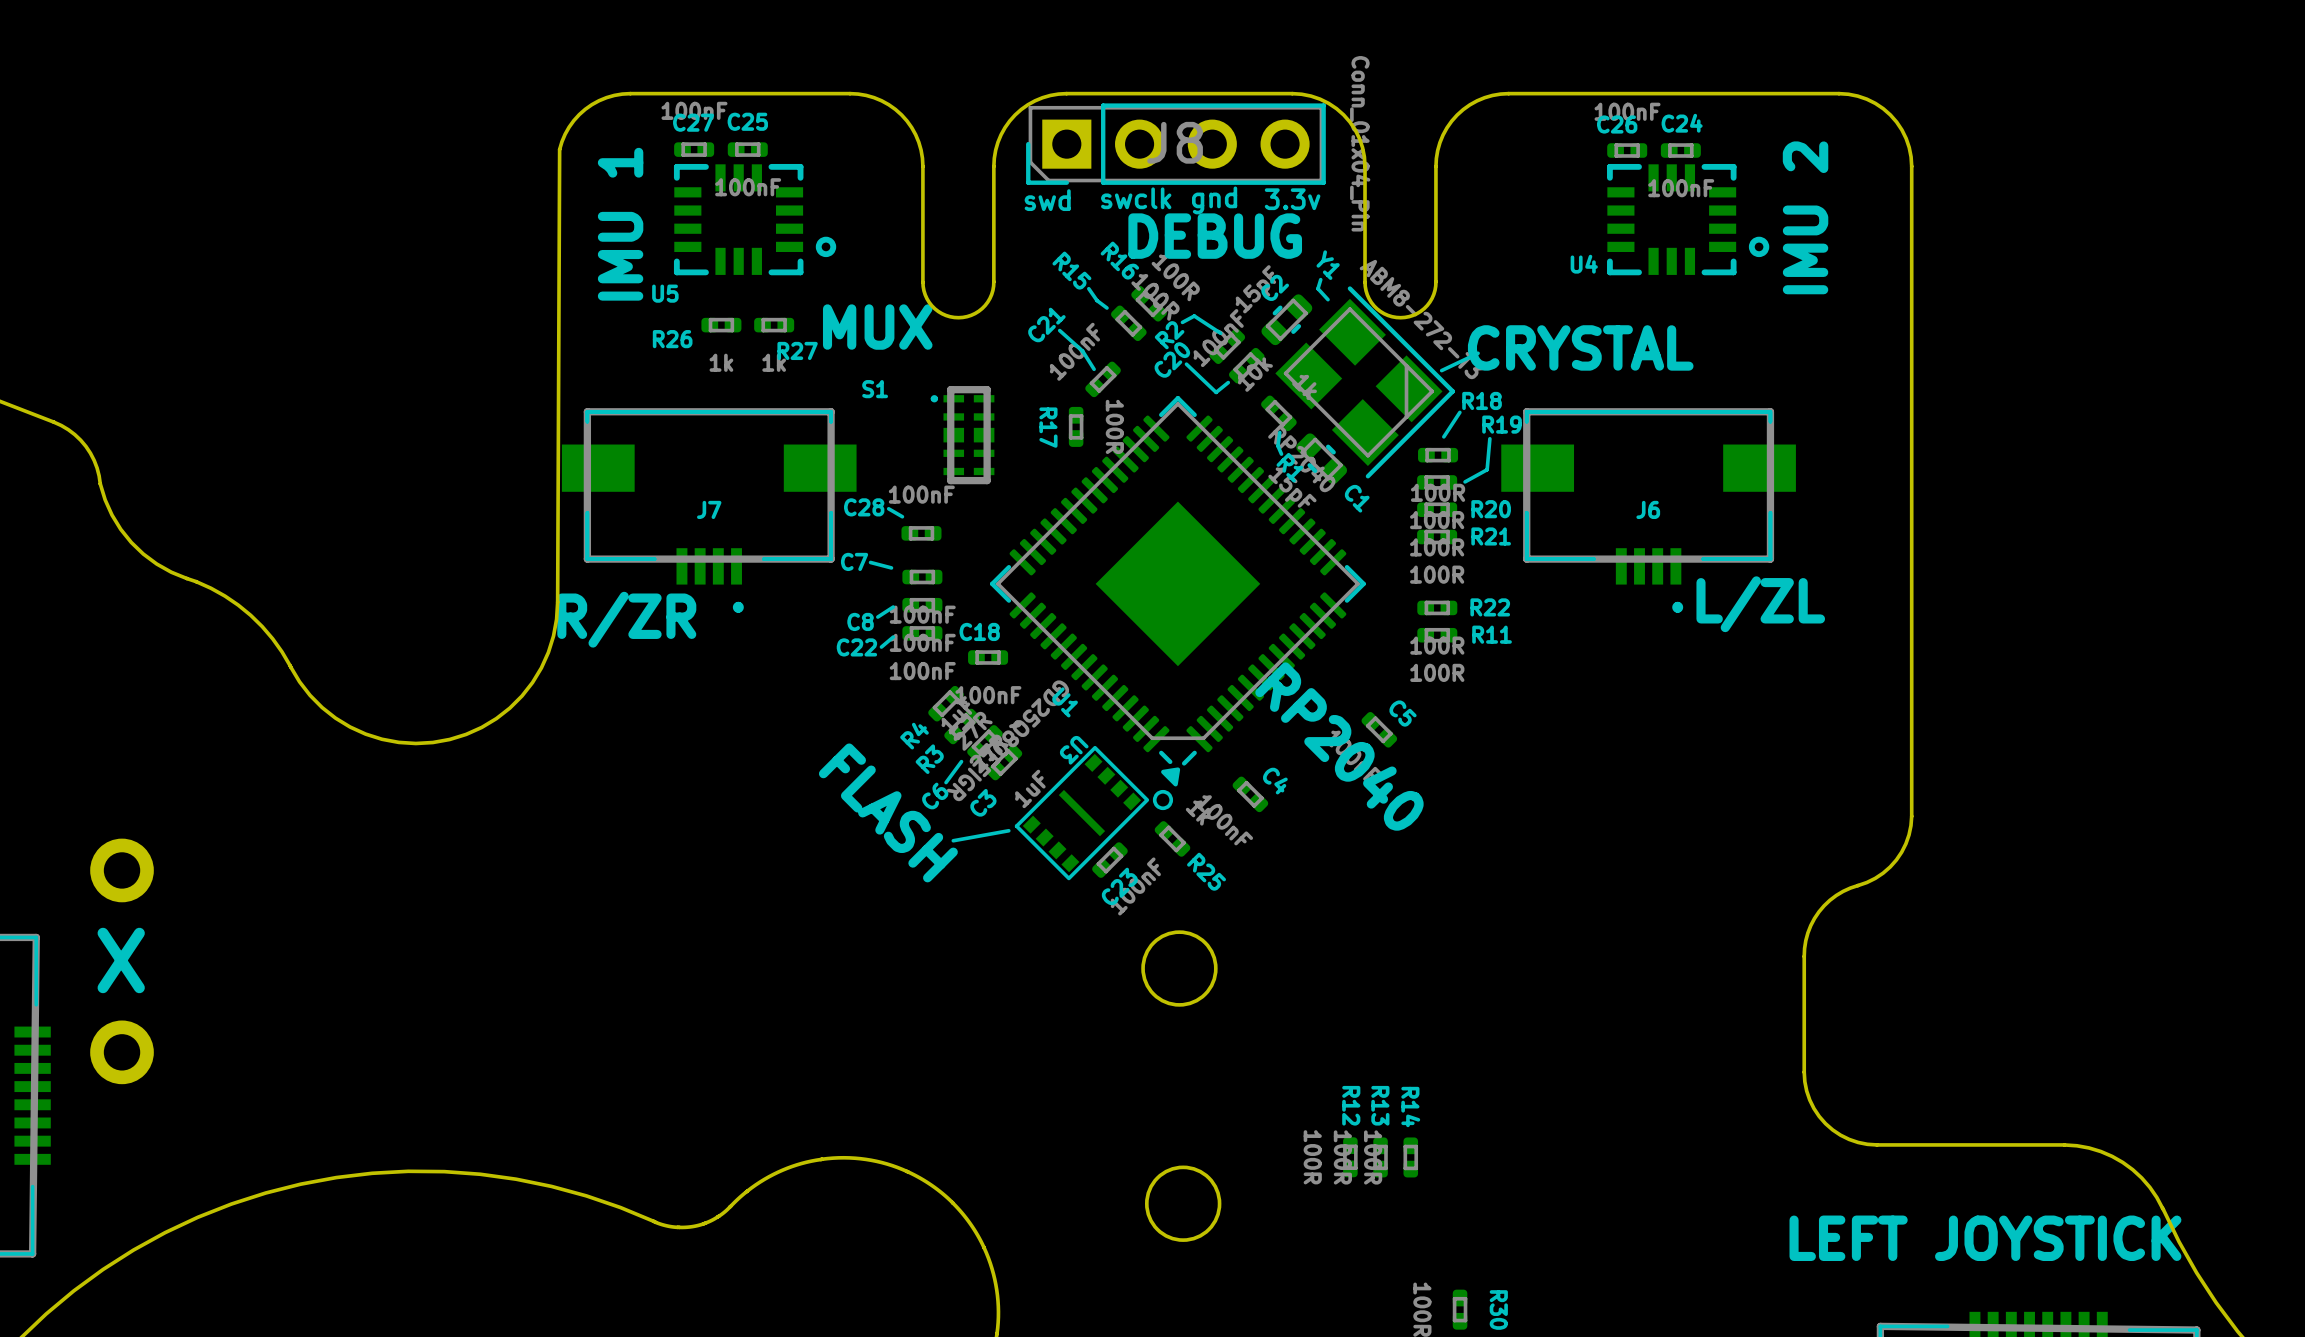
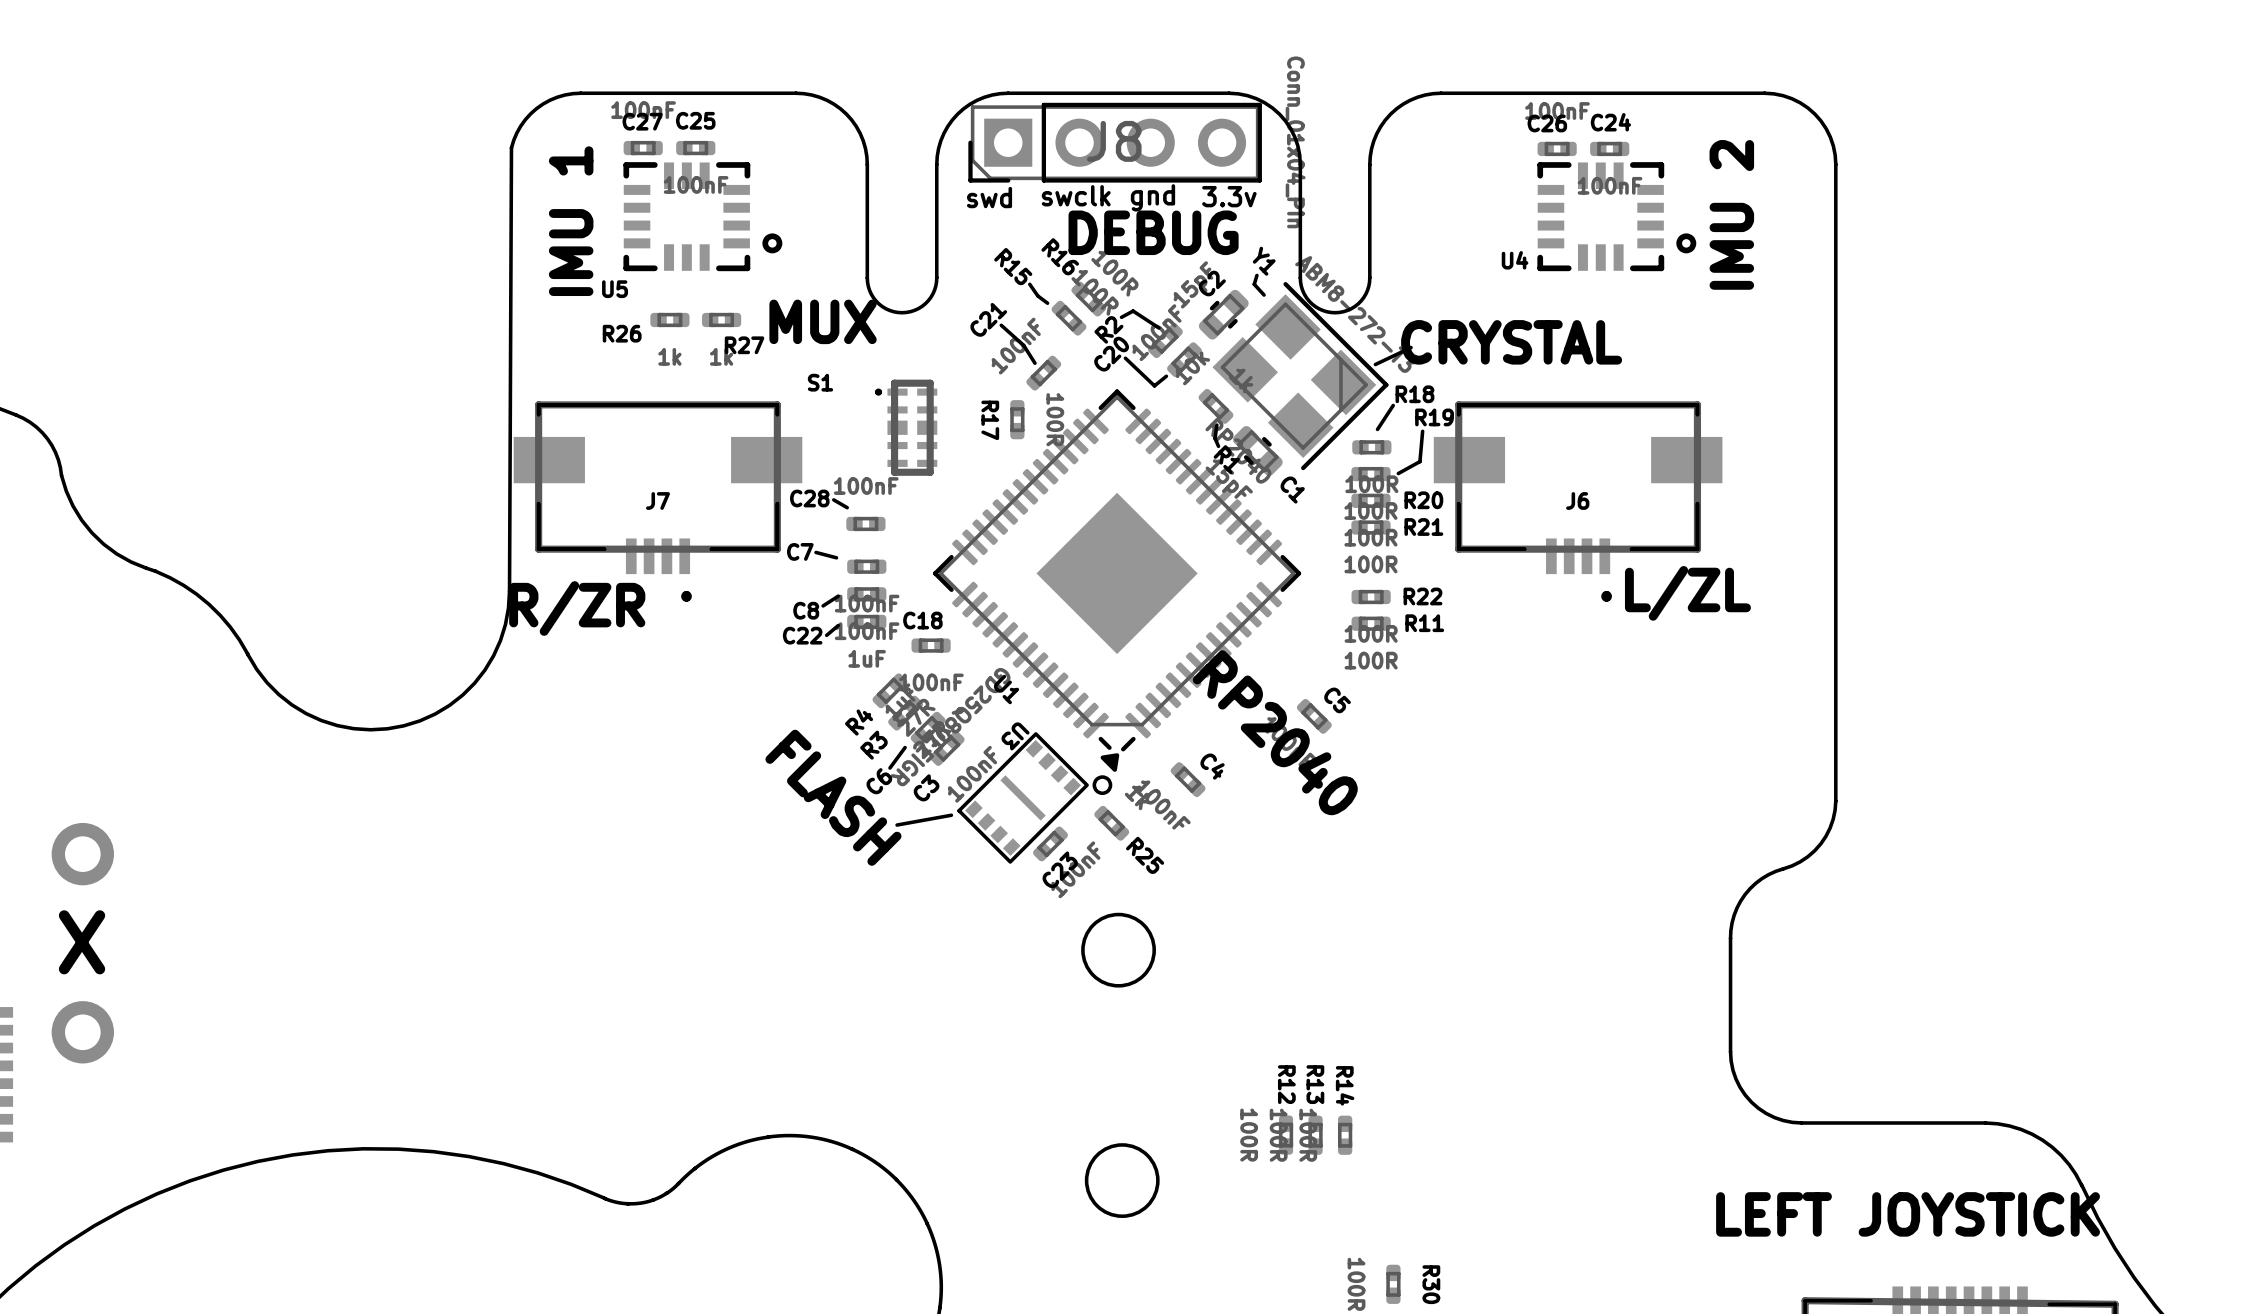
C22 value: 100nF (922, 671) -> 1uF (867, 658)
C3 value: 1uF (1030, 788) -> 100nF (972, 774)

